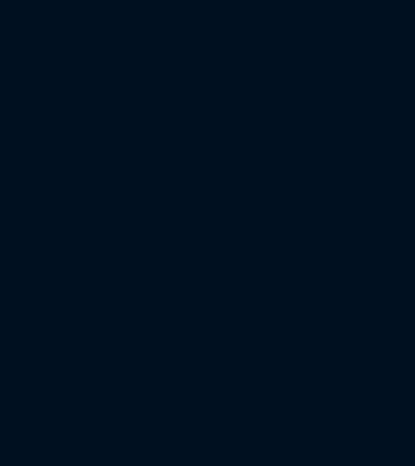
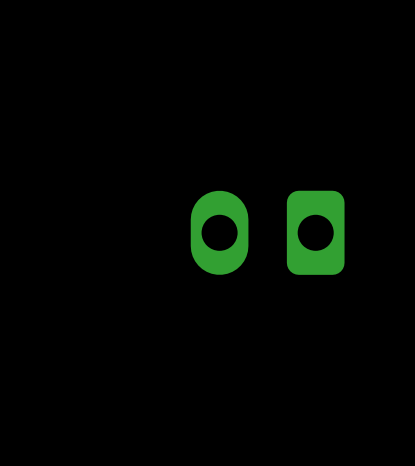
part: none -> (267, 232)

